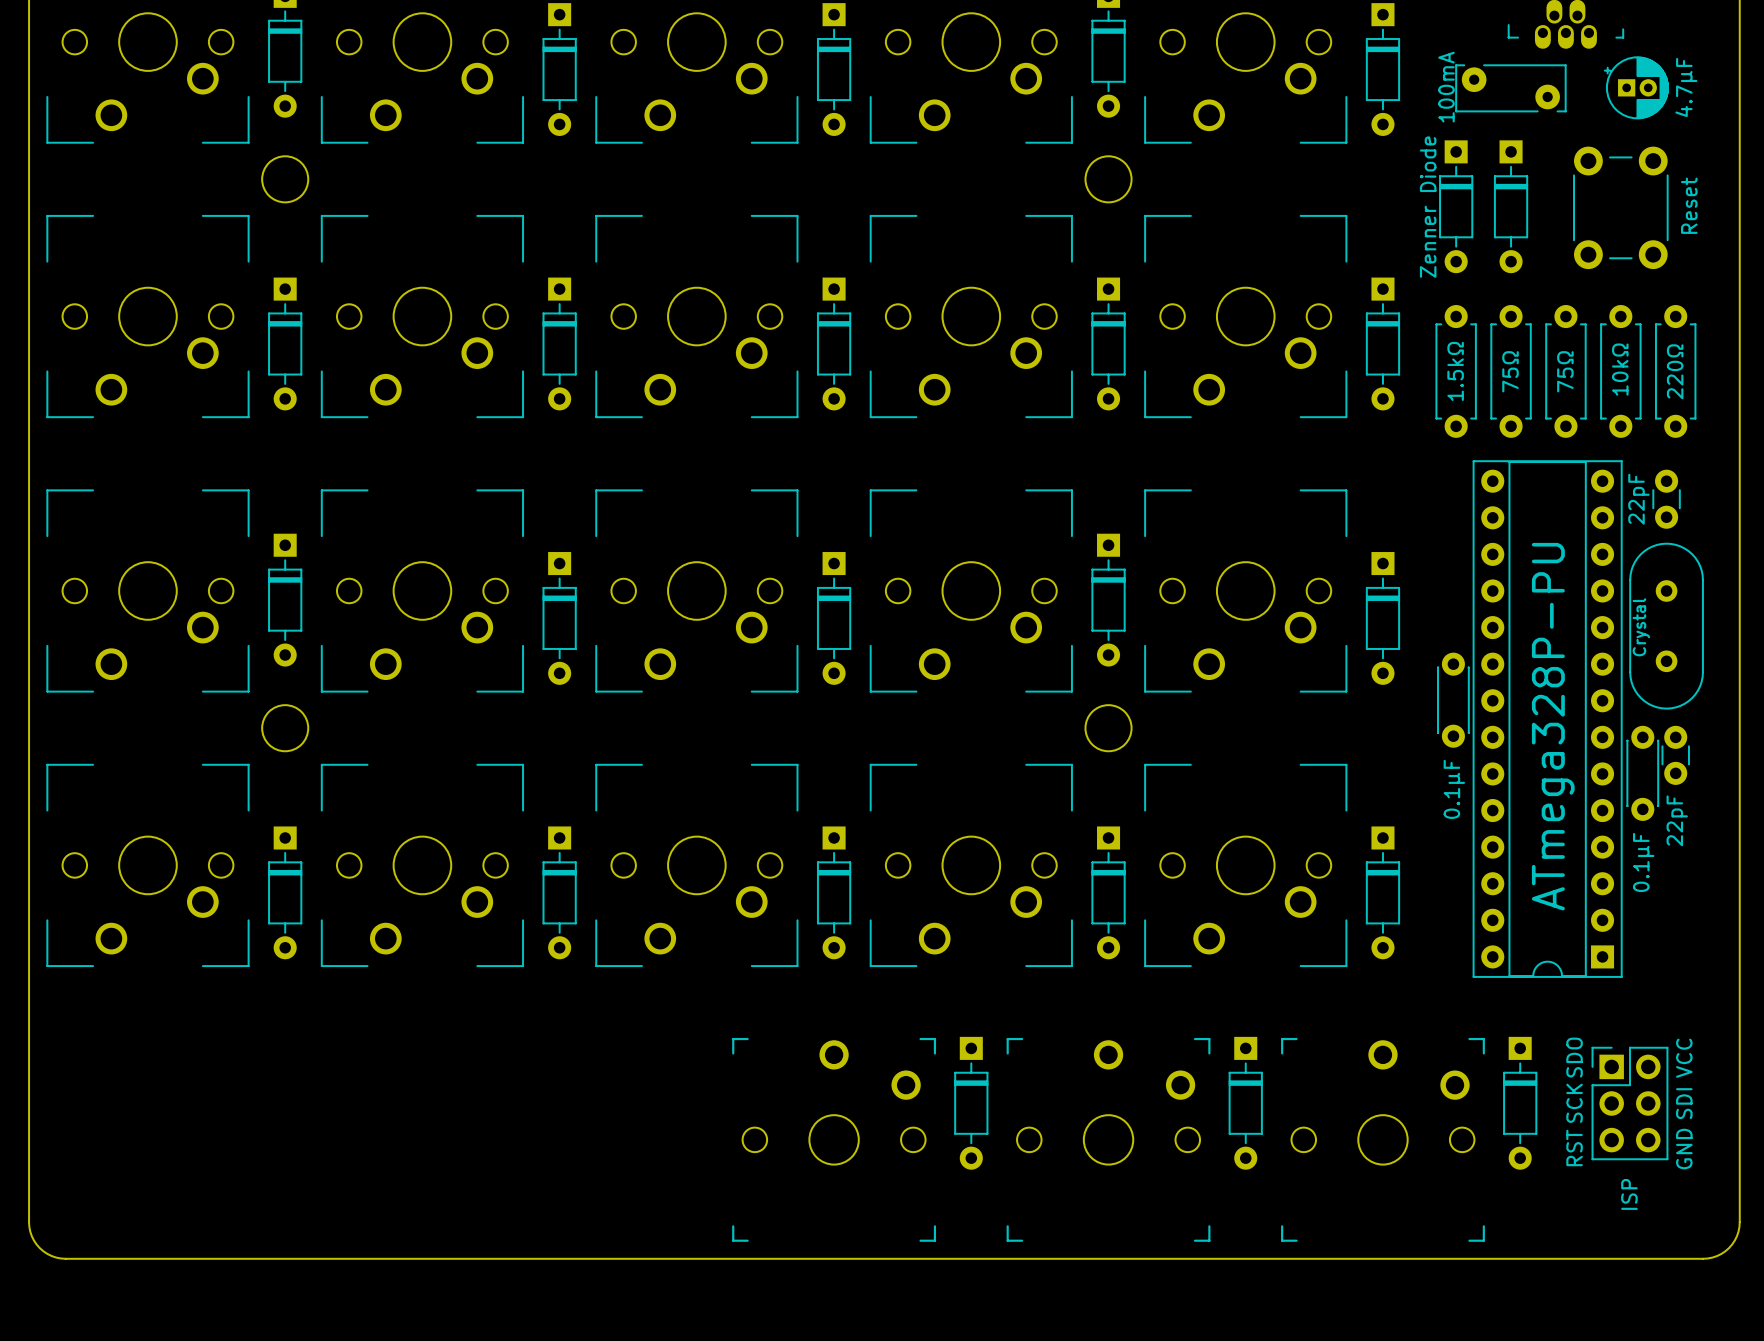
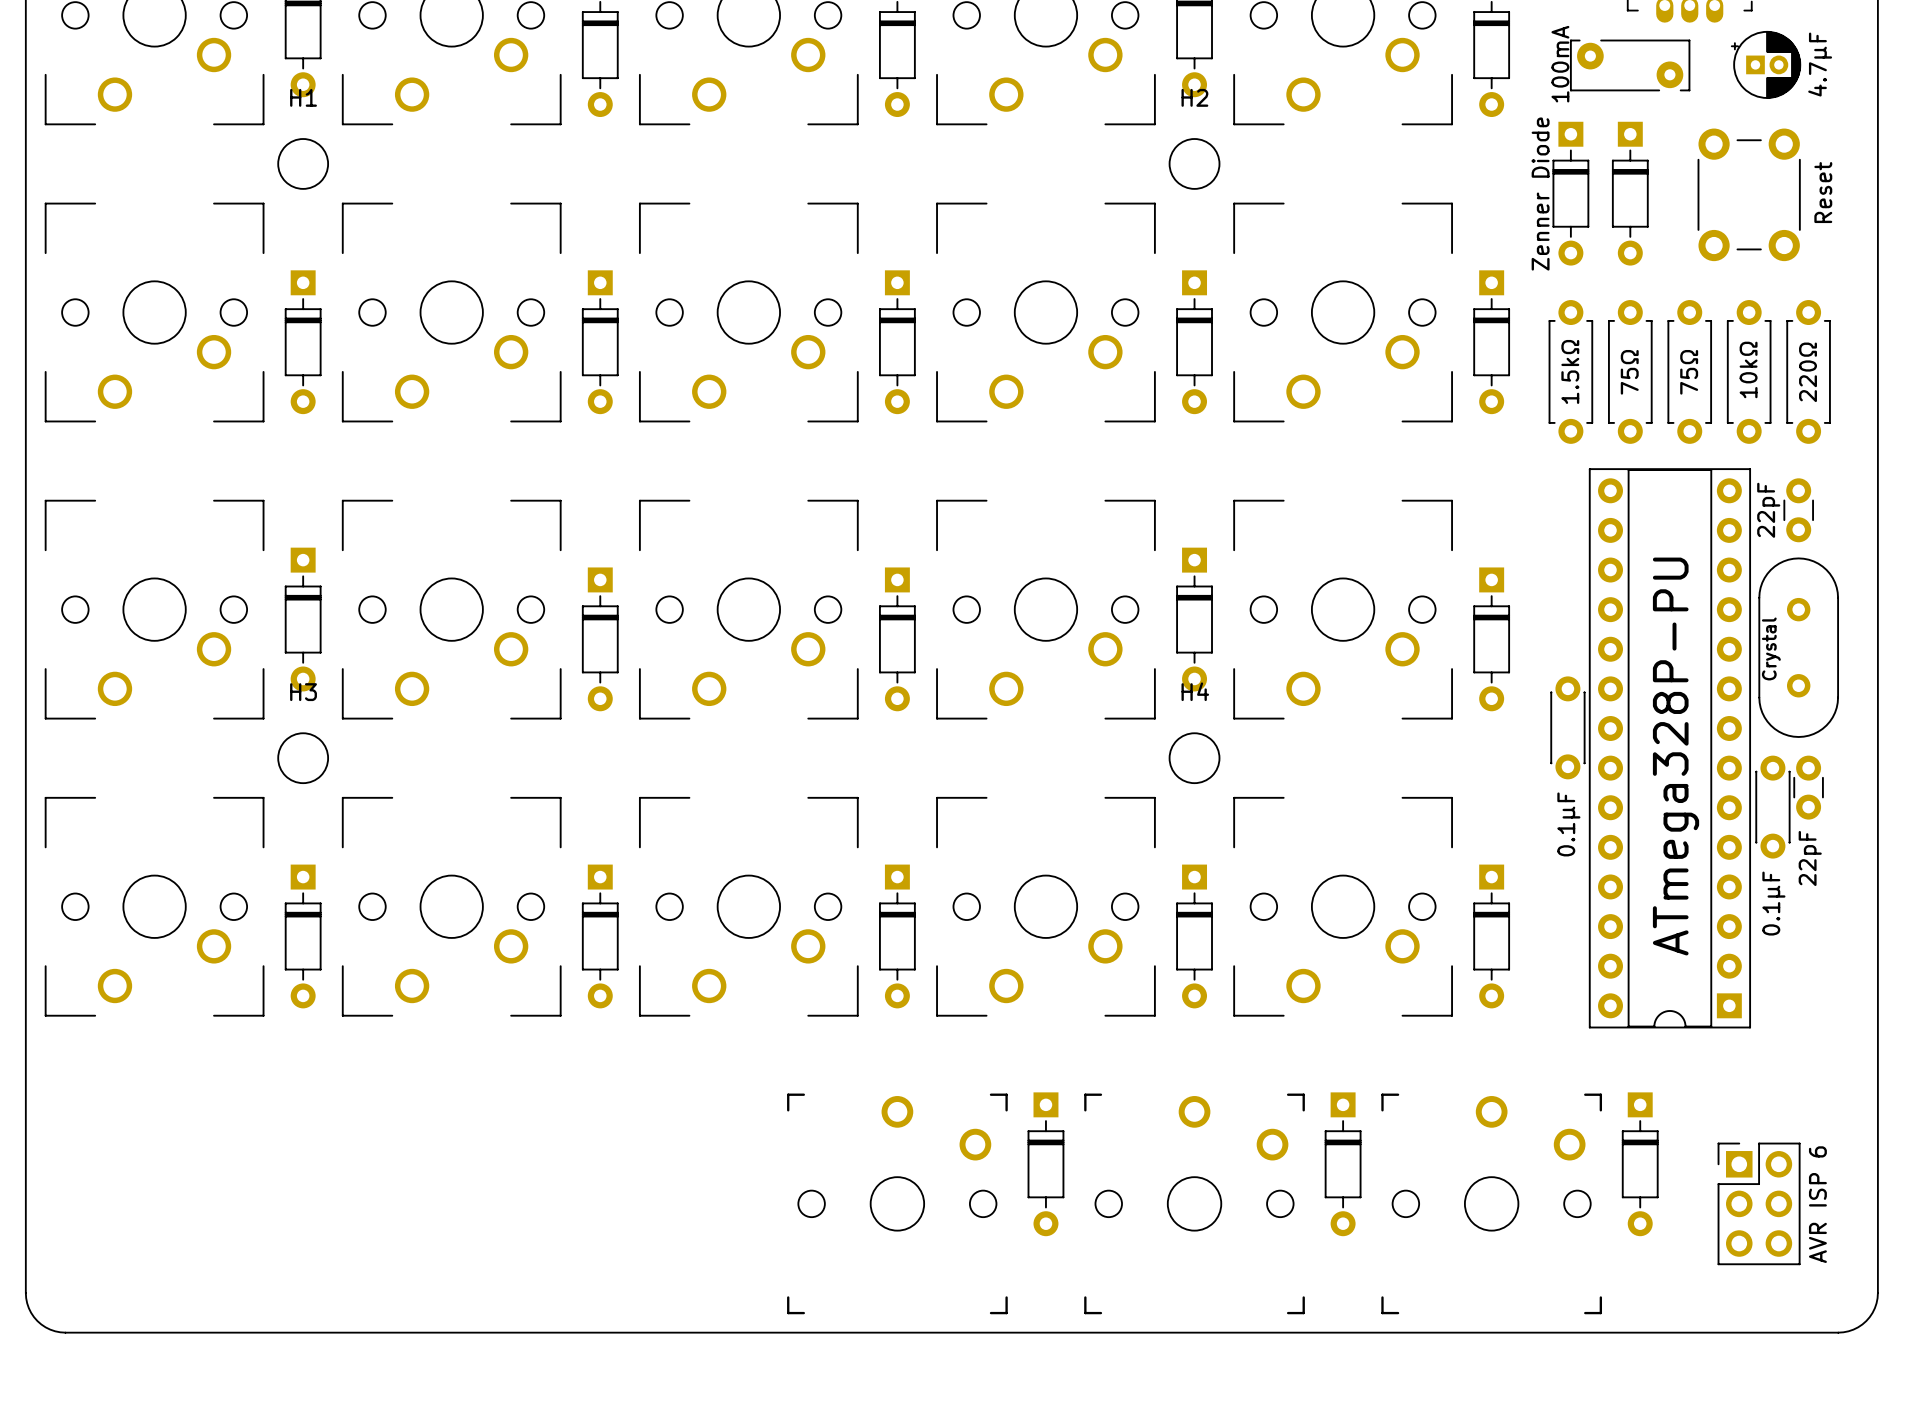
H1 name: none -> H1 (303, 97)
H2 name: none -> H2 (1194, 97)
H4 name: none -> H4 (1195, 691)
H3 name: none -> H3 (303, 692)
part: ISP (1629, 1103) -> none
part: none -> AVR ISP 6 (1759, 1203)

